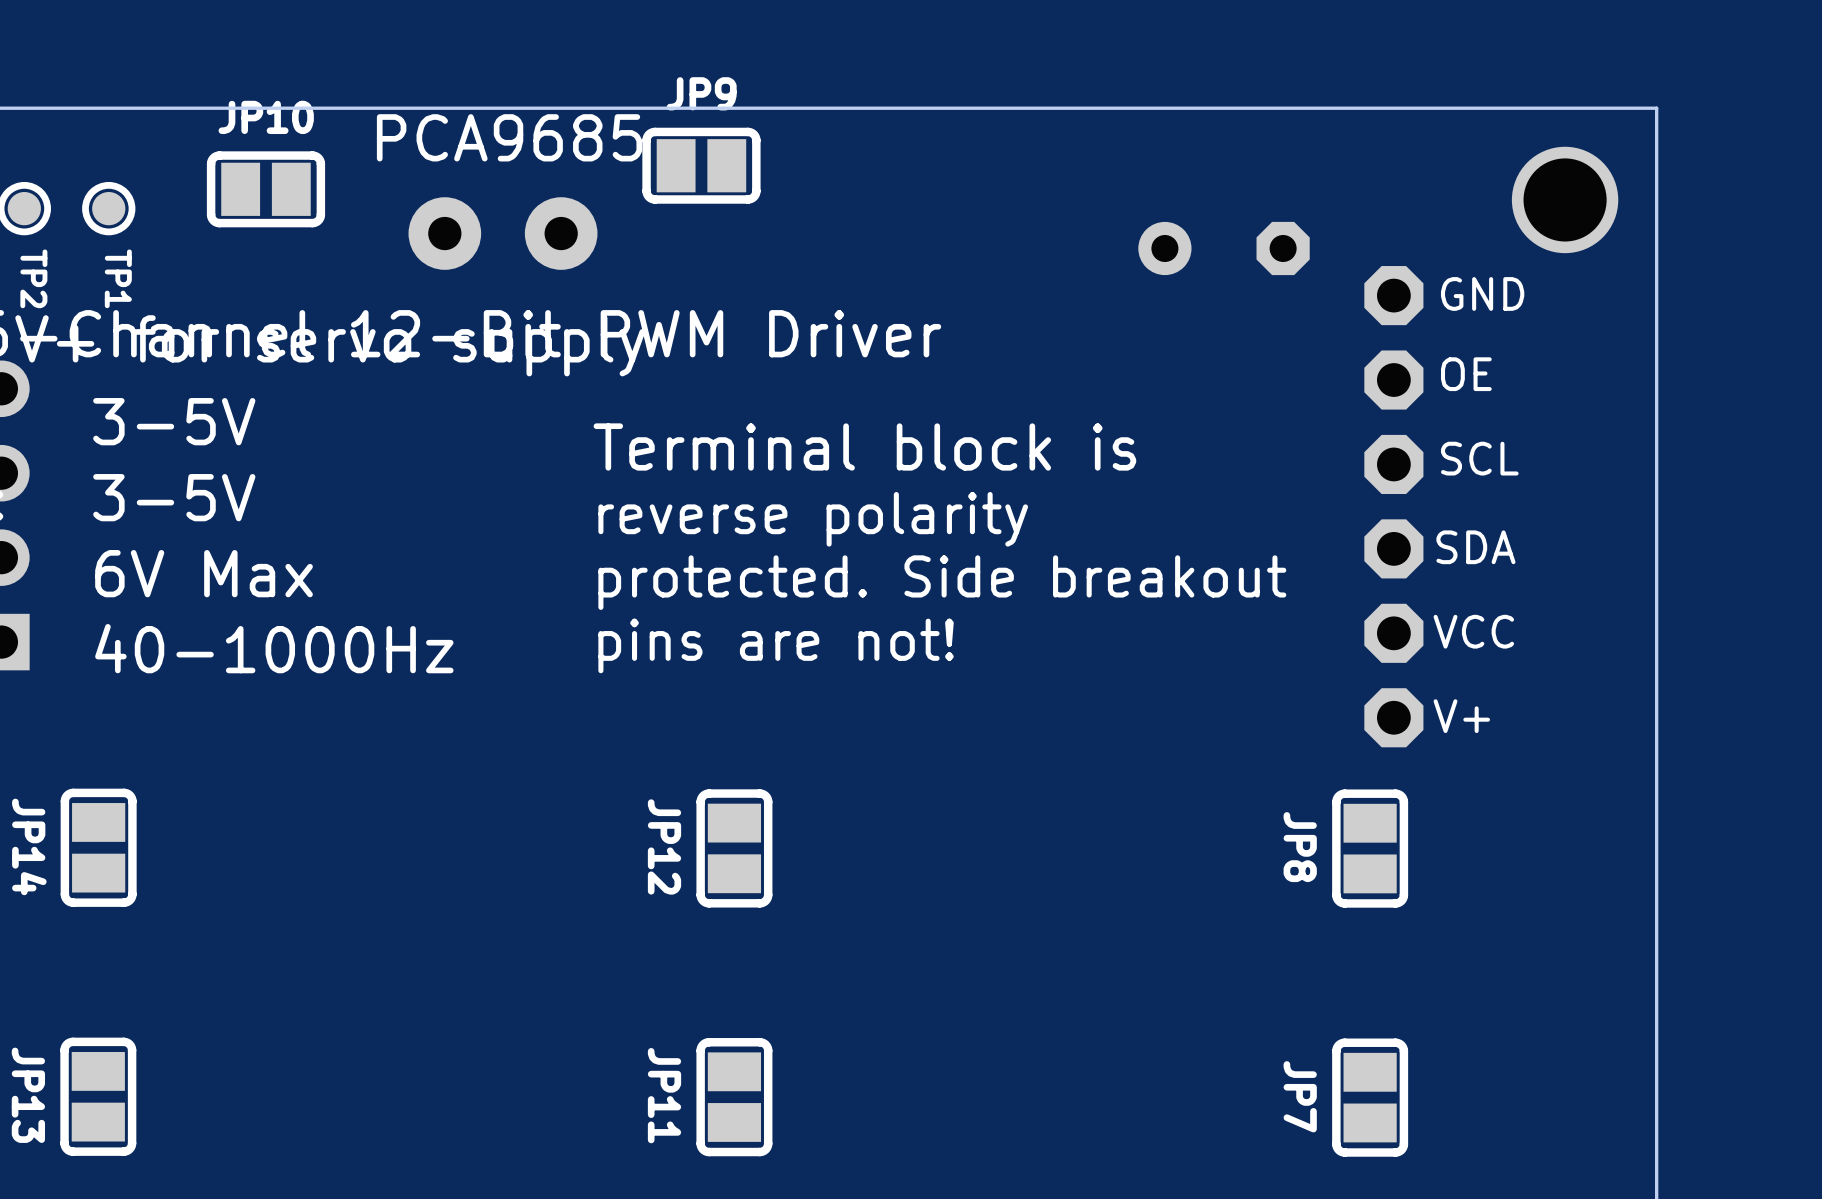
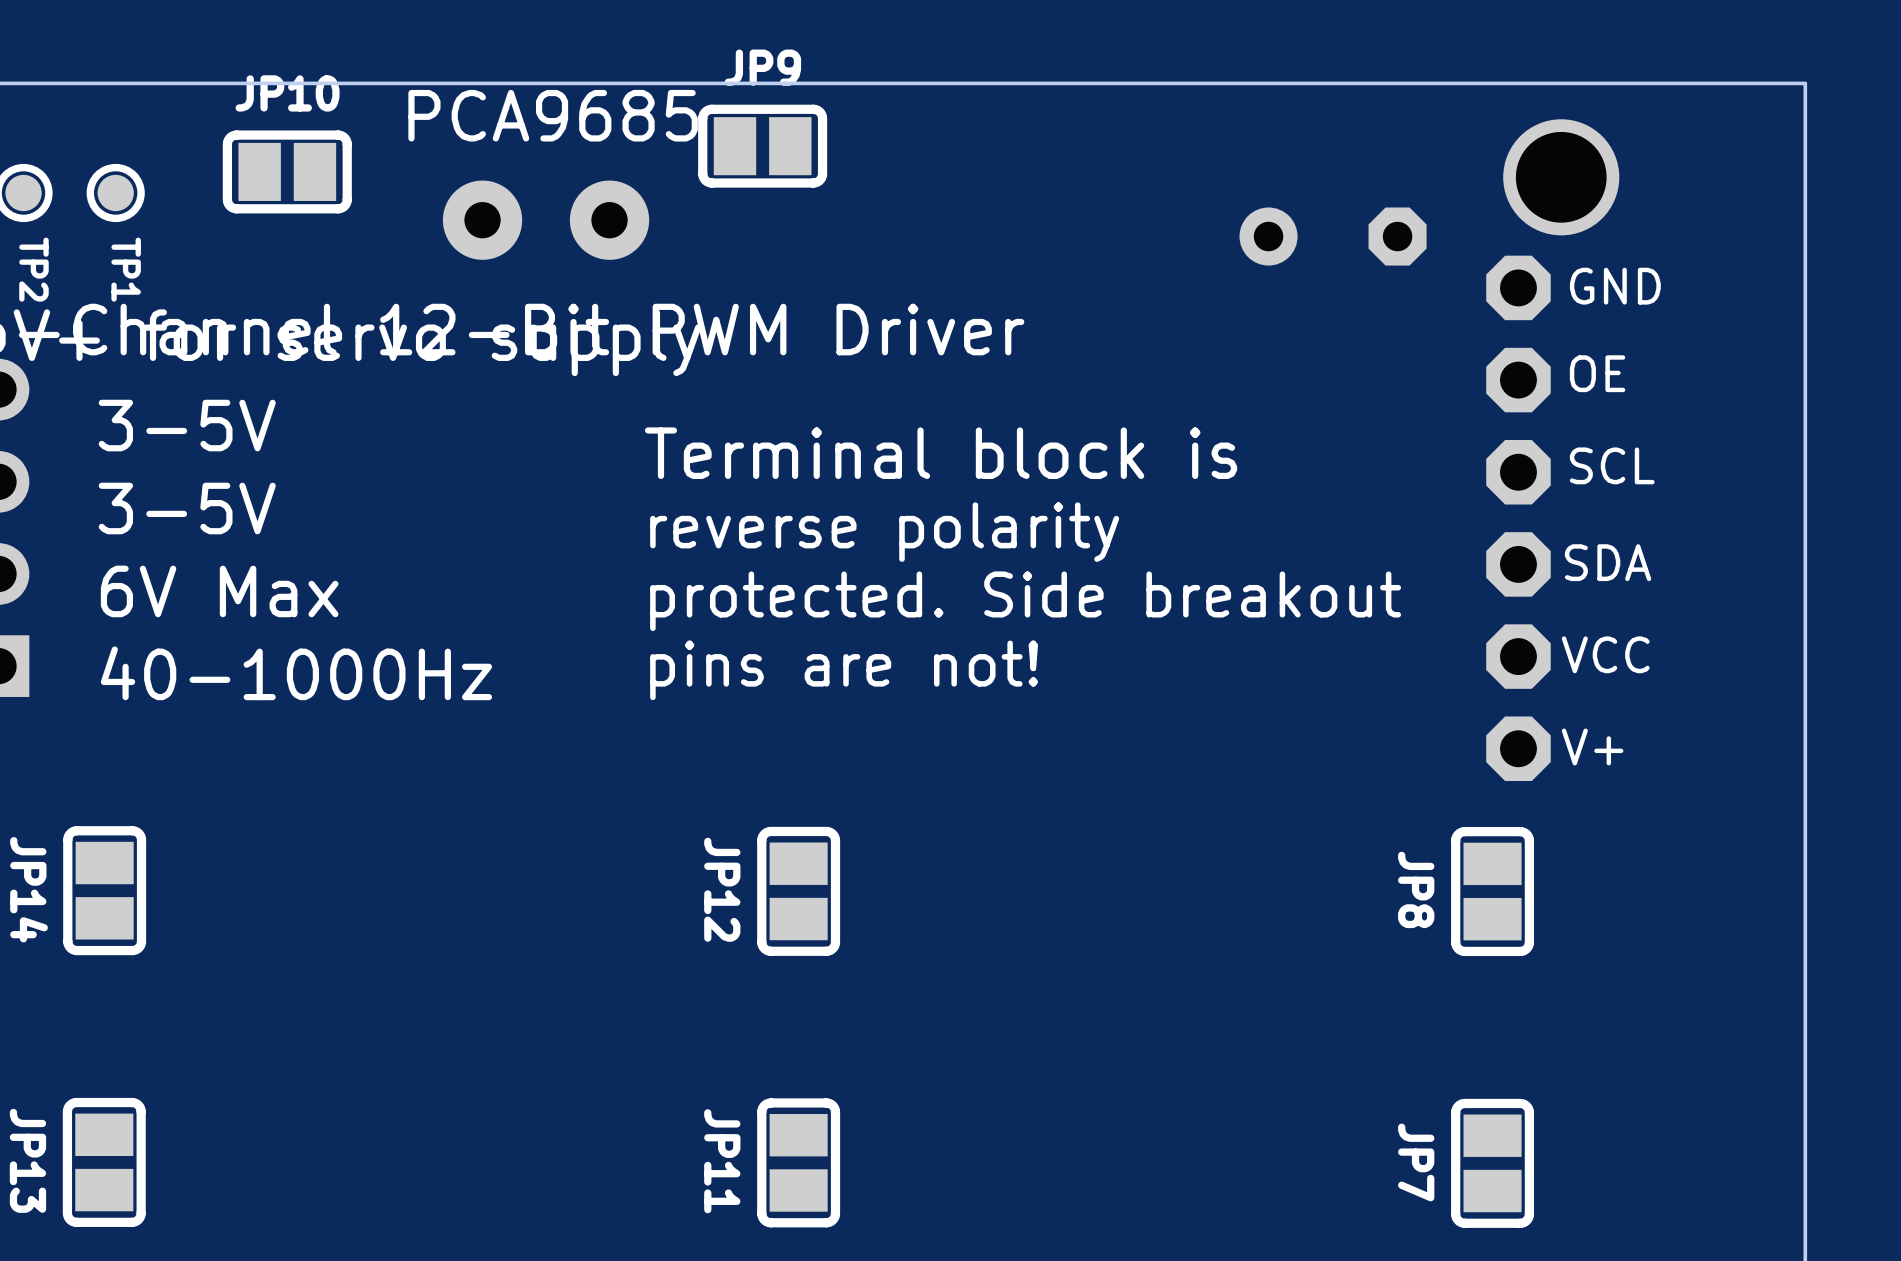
part position: (1565, 199) -> (1561, 177)

